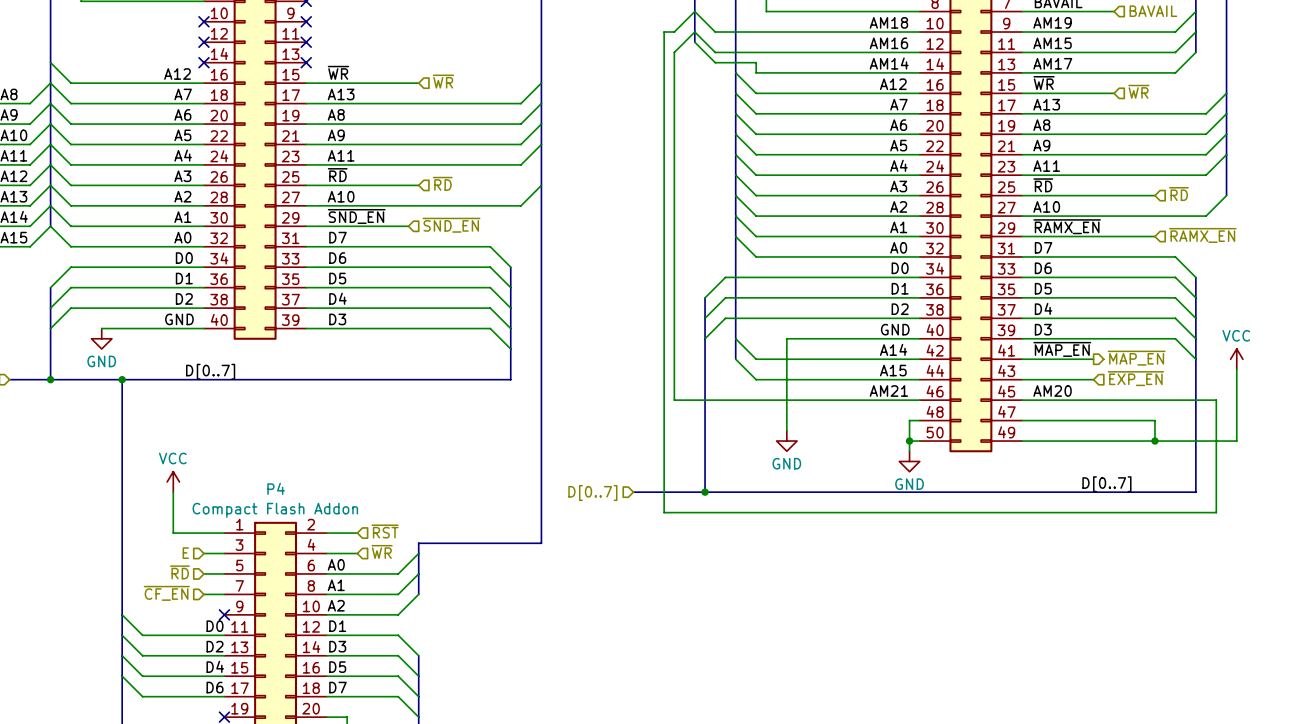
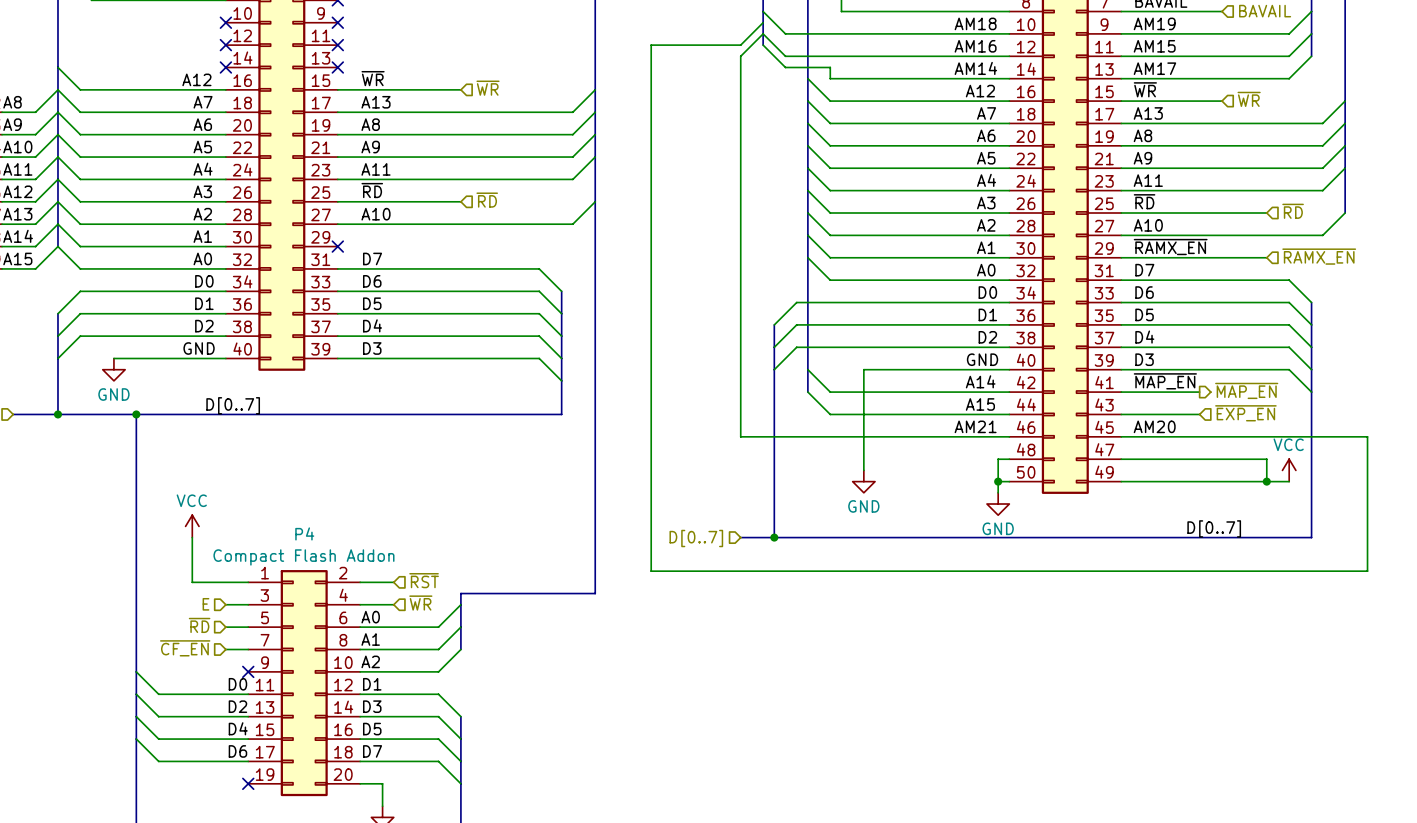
wire: (694, 11) (674, 32) (664, 32) (664, 512) (1216, 512) (1216, 400) -> (763, 22) (740, 45) (651, 45) (651, 571) (1367, 571) (1367, 436) (1333, 436)
label: ~{SND_EN} (356, 216) -> none
hierarchical label: ~{SND_EN} (451, 225) -> none
wire: (306, 226) (408, 226) -> none
no-connect mark: none -> (337, 246)
power symbol position: VCC (1236, 359) -> VCC (1289, 470)
wire: (1236, 369) (1236, 441) (1175, 441) -> none
bus: (633, 492) (674, 492) -> none
hierarchical label position: D[0..7] (592, 493) -> D[0..7] (696, 538)

